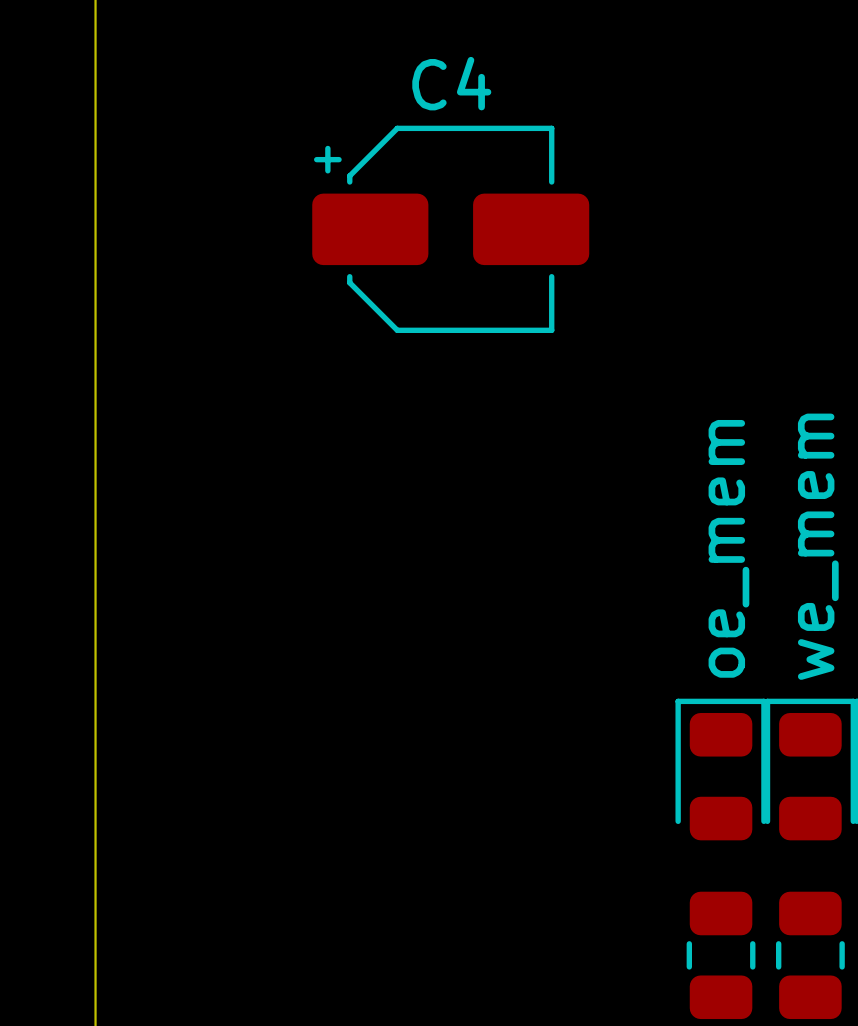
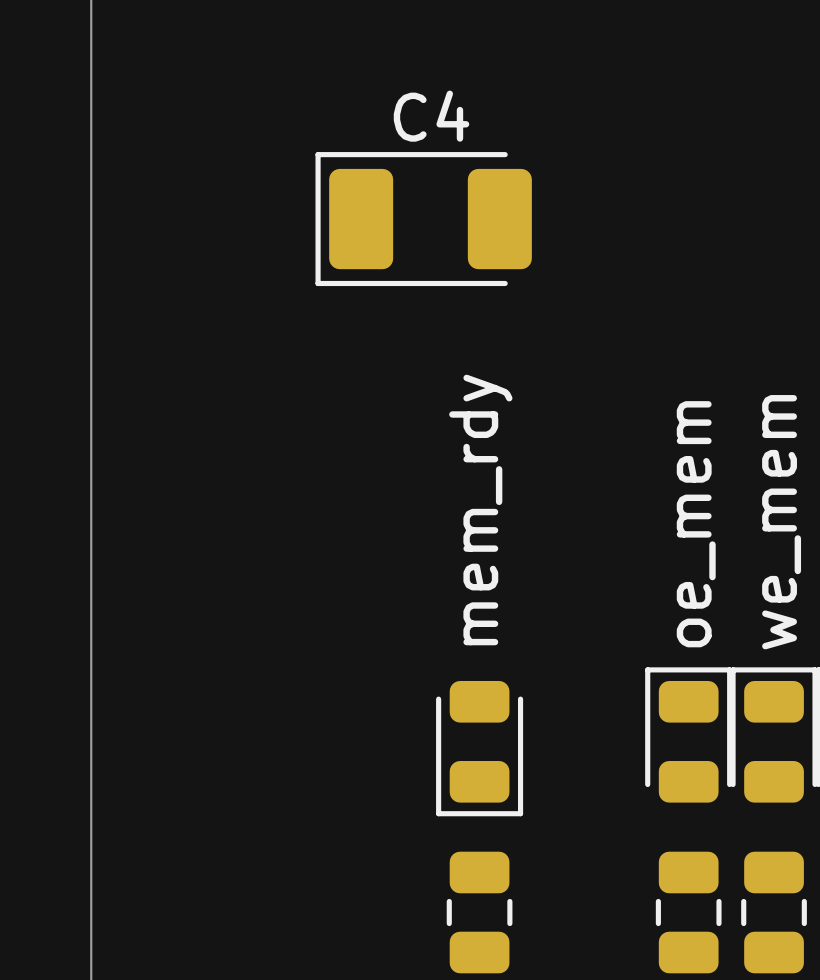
C4 footprint: [312, 125, 590, 333] -> [315, 152, 532, 287]
text: none -> mem_rdy (480, 510)
part: none -> (479, 748)
part: none -> (479, 912)

